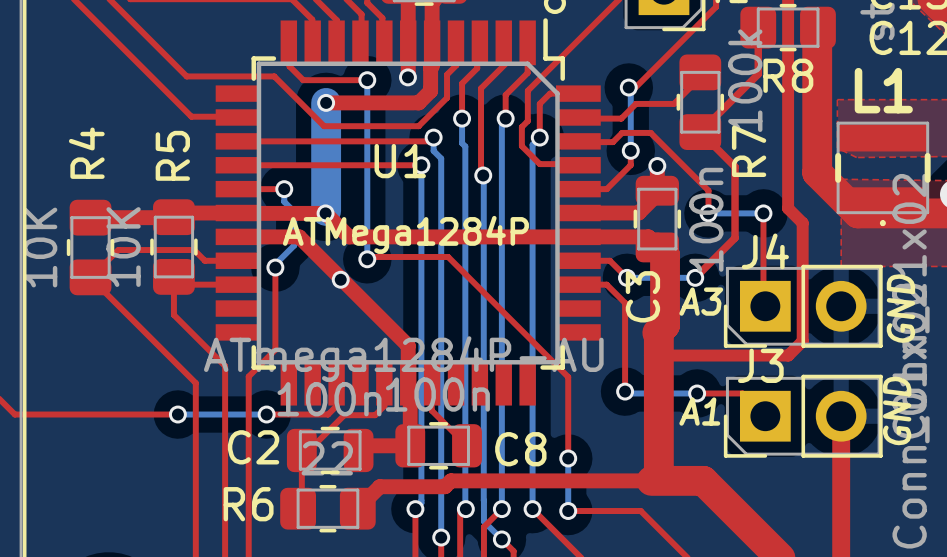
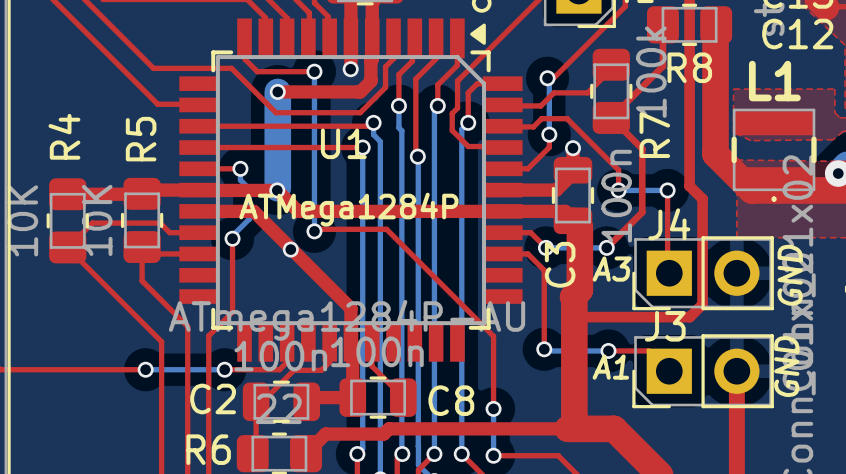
U1 footprint: [215, 18, 601, 406] -> [179, 18, 523, 362]

